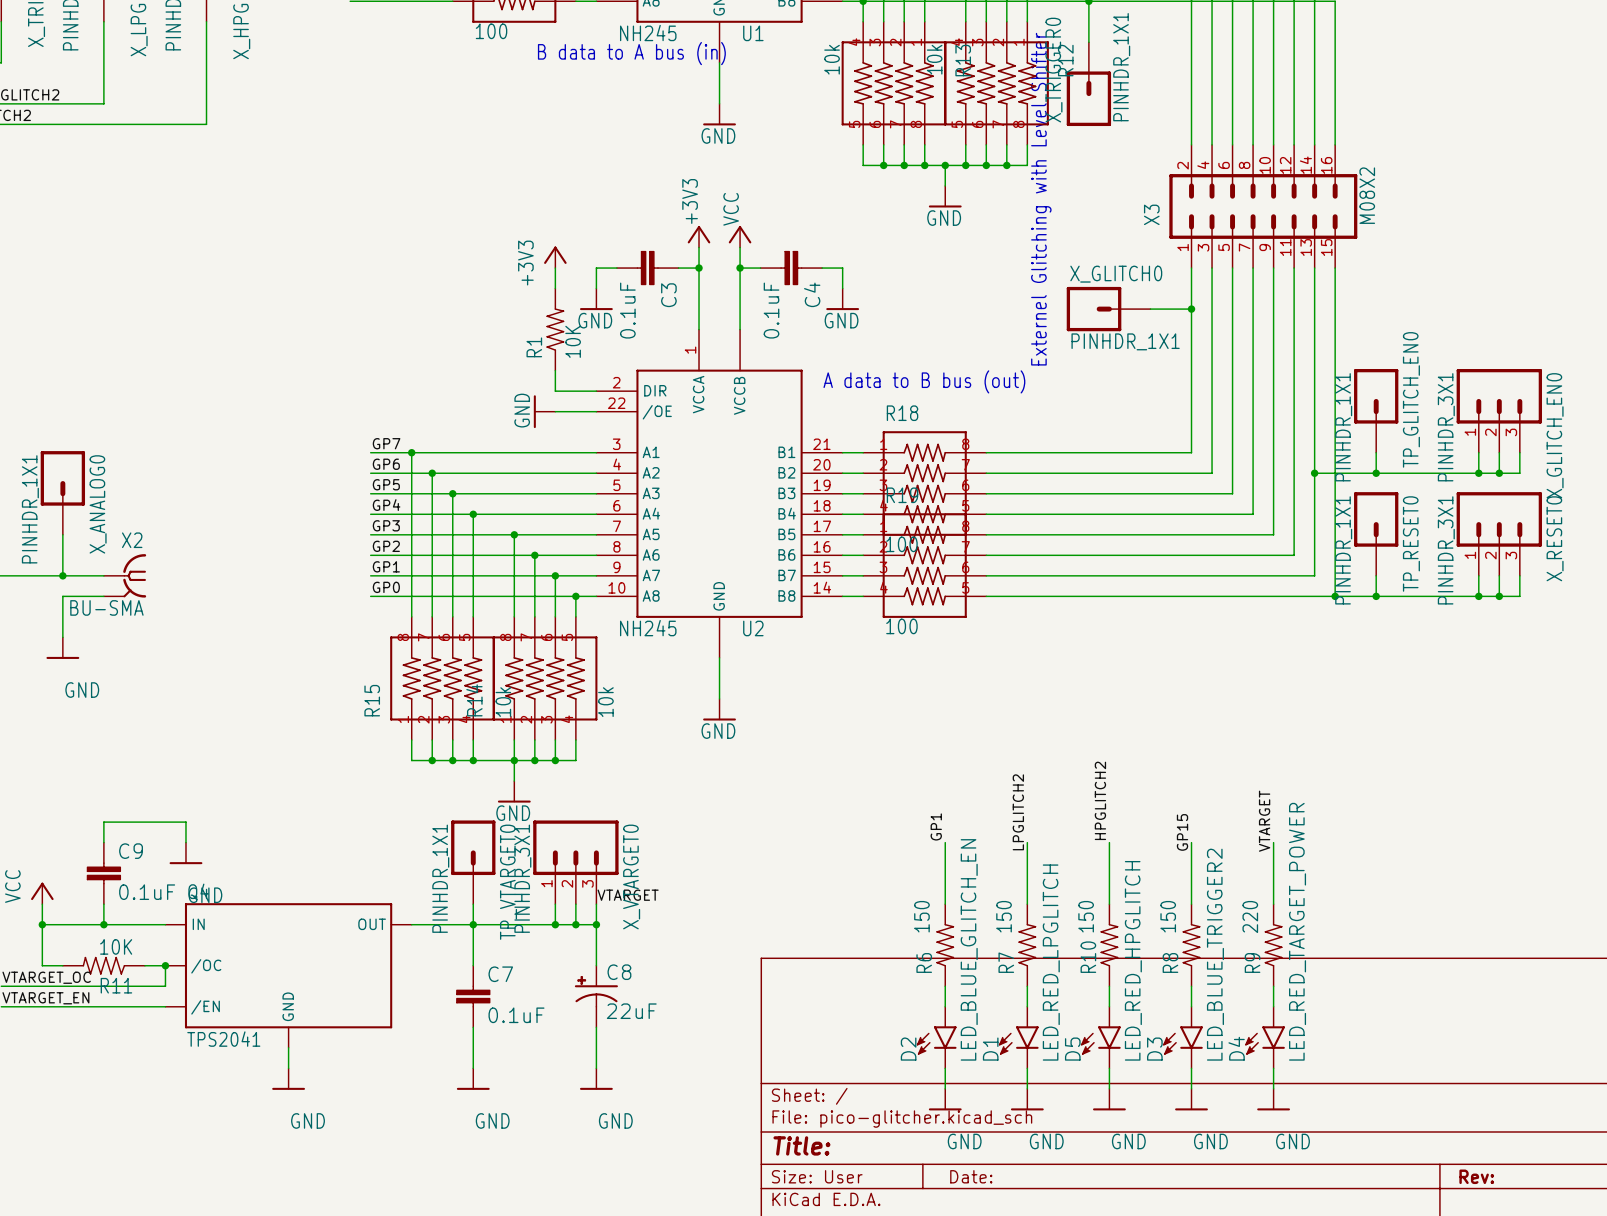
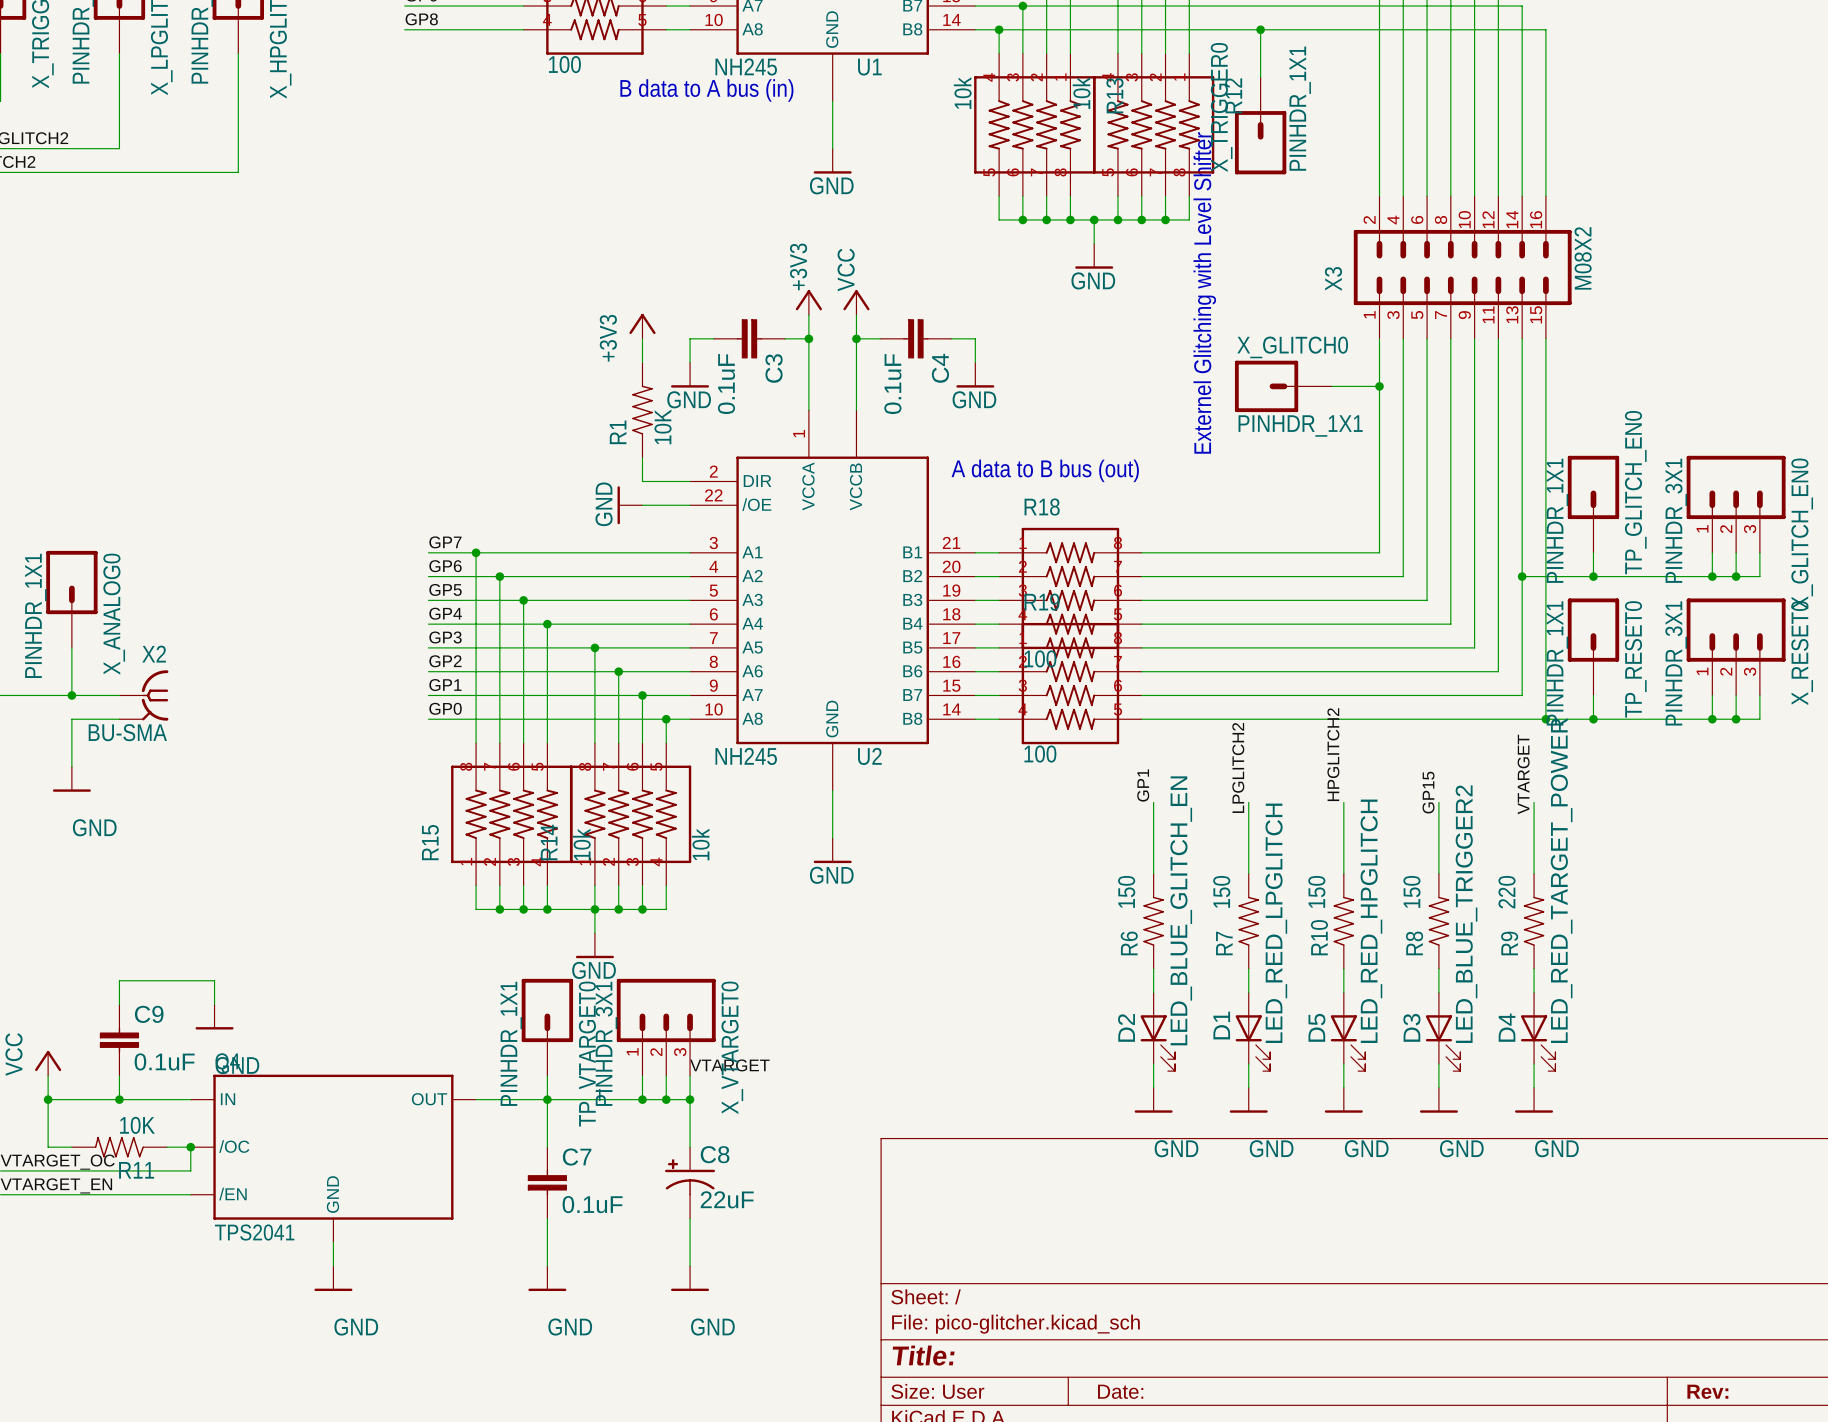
label position: HPGLITCH2 (1100, 800) -> HPGLITCH2 (1333, 754)
label position: LPGLITCH2 (1018, 812) -> LPGLITCH2 (1238, 767)
label position: VTARGET (1264, 821) -> VTARGET (1523, 774)
label position: GP1 (936, 826) -> GP1 (1143, 785)
label position: GP15 (1182, 832) -> GP15 (1428, 792)
wire: (945, 842) (945, 904) -> (1153, 802) (1153, 873)
wire: (1027, 842) (1027, 904) -> (1248, 802) (1248, 873)
wire: (1109, 842) (1109, 904) -> (1343, 802) (1343, 873)
wire: (1191, 842) (1191, 904) -> (1438, 802) (1438, 873)
wire: (1273, 842) (1273, 904) -> (1534, 802) (1534, 873)
power symbol: none -> GND (1153, 1100)
power symbol: none -> GND (1248, 1100)
power symbol: none -> GND (1343, 1100)
power symbol: none -> GND (1438, 1100)
power symbol: none -> GND (1534, 1100)
D4 value position: LED_RED_TARGET_POWER (1297, 931) -> LED_RED_TARGET_POWER (1561, 880)
R6 position: (945, 945) -> (1153, 921)
R7 position: (1027, 945) -> (1248, 921)
R10 position: (1109, 945) -> (1343, 921)
R8 position: (1191, 945) -> (1438, 921)
R9 position: (1273, 945) -> (1534, 921)
D2 value position: LED_BLUE_GLITCH_EN (969, 949) -> LED_BLUE_GLITCH_EN (1181, 910)
D3 value position: LED_BLUE_TRIGGER2 (1215, 954) -> LED_BLUE_TRIGGER2 (1466, 914)
D5 value position: LED_RED_HPGLITCH (1133, 960) -> LED_RED_HPGLITCH (1371, 921)
D1 value position: LED_RED_LPGLITCH (1051, 962) -> LED_RED_LPGLITCH (1276, 923)
wire: (945, 986) (945, 1006) -> (1153, 968) (1153, 992)
wire: (1027, 986) (1027, 1006) -> (1248, 968) (1248, 992)
wire: (1109, 986) (1109, 1006) -> (1343, 968) (1343, 992)
wire: (1191, 986) (1191, 1006) -> (1438, 968) (1438, 992)
wire: (1273, 986) (1273, 1006) -> (1534, 968) (1534, 992)
D2 symbol: [916, 1006, 957, 1069] -> [1140, 992, 1176, 1072]
D1 symbol: [999, 1006, 1039, 1069] -> [1235, 992, 1271, 1072]
D5 symbol: [1081, 1006, 1121, 1069] -> [1330, 992, 1366, 1072]
D3 symbol: [1163, 1006, 1203, 1069] -> [1425, 992, 1461, 1072]
D4 symbol: [1245, 1006, 1285, 1069] -> [1520, 992, 1556, 1072]
wire: (945, 1068) (945, 1088) -> (1153, 1063) (1153, 1087)
wire: (1027, 1068) (1027, 1088) -> (1248, 1063) (1248, 1087)
wire: (1109, 1068) (1109, 1088) -> (1343, 1063) (1343, 1087)
wire: (1191, 1068) (1191, 1088) -> (1438, 1063) (1438, 1087)
wire: (1273, 1068) (1273, 1088) -> (1534, 1063) (1534, 1087)
power symbol: GND (945, 1099) -> none
power symbol: GND (1027, 1099) -> none
power symbol: GND (1109, 1099) -> none
power symbol: GND (1191, 1099) -> none
power symbol: GND (1273, 1099) -> none

